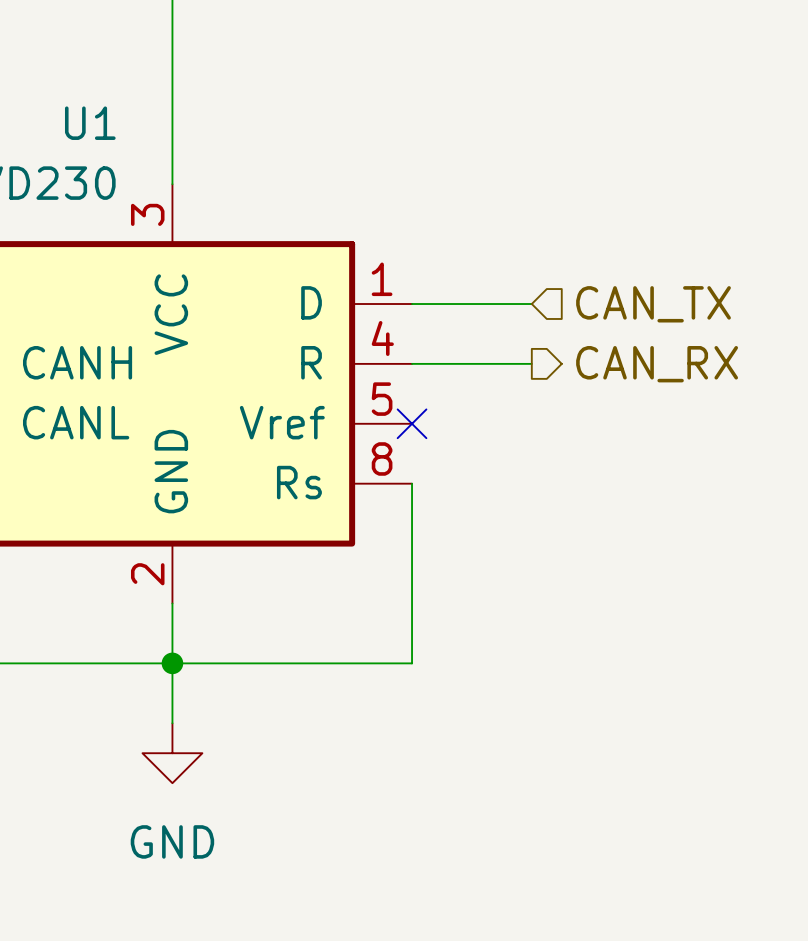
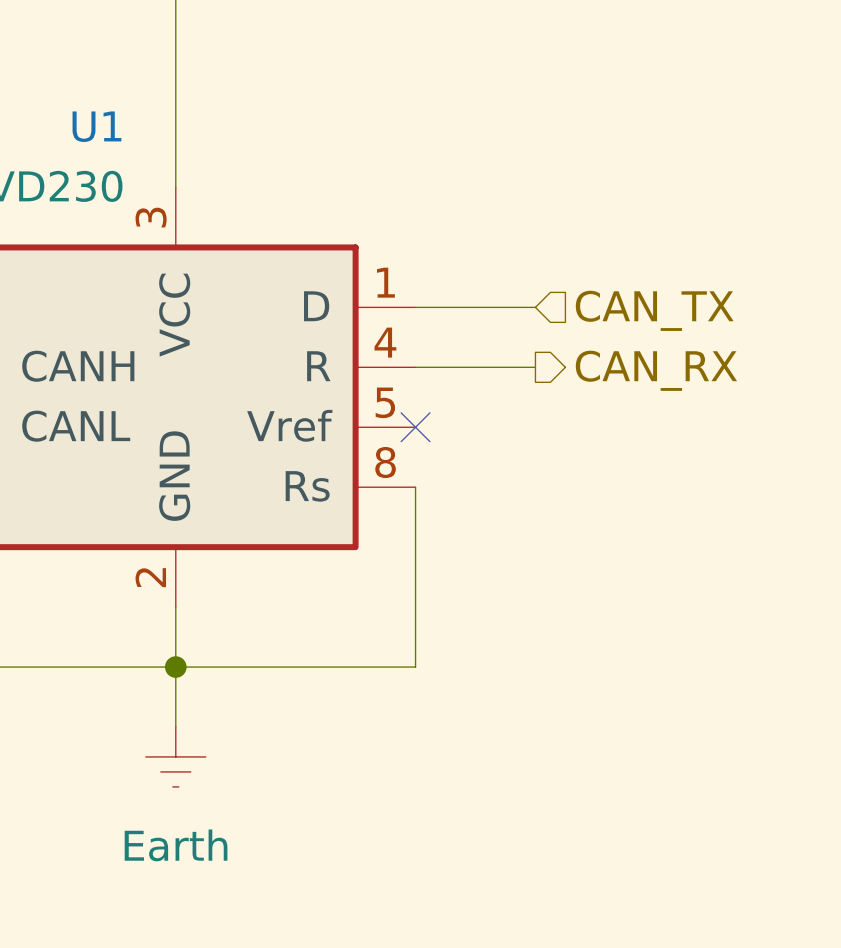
power symbol: GND (172, 753) -> Earth (175, 756)

